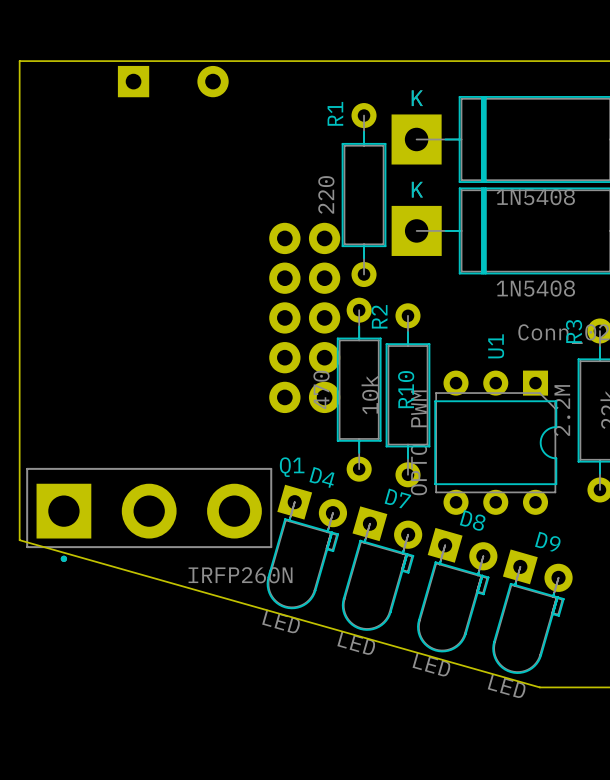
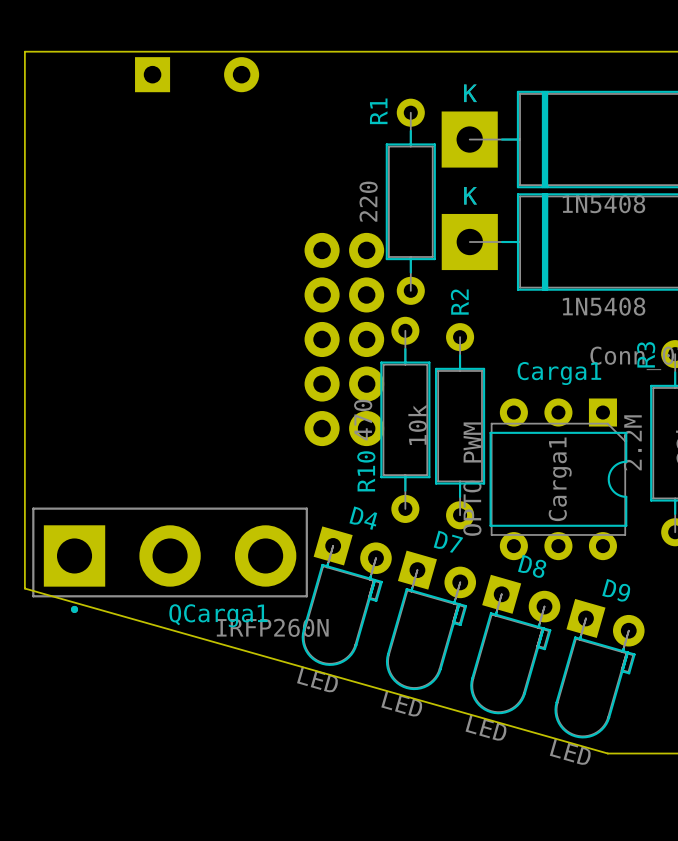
R2 name position: R2 (379, 316) -> R2 (459, 302)
U1 name: U1 (496, 346) -> Carga1 (559, 373)
R10 name position: R10 (406, 389) -> R10 (366, 471)
U1 text: none -> Carga1 (560, 479)
Q1 name: Q1 (292, 467) -> QCarga1 (218, 615)

